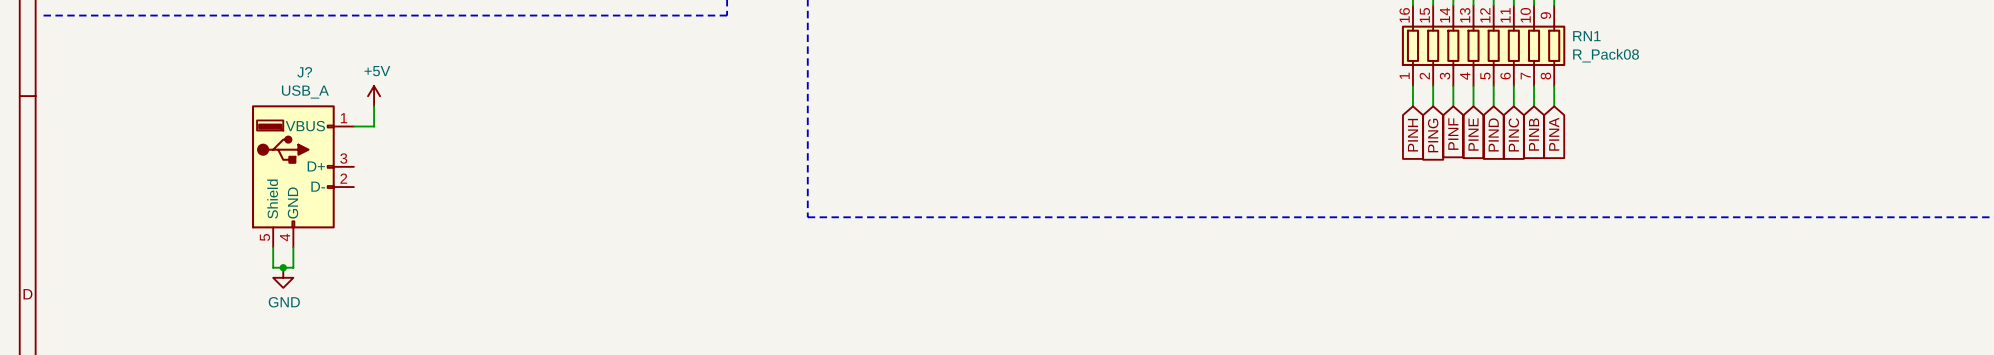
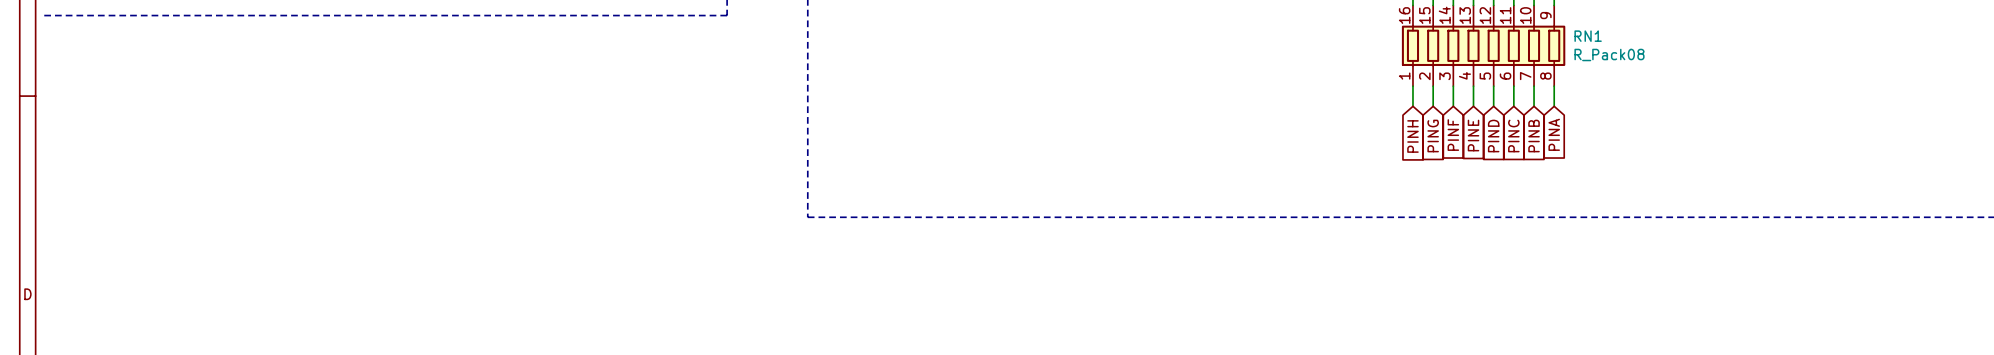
power symbol: +5V (374, 96) -> none
wire: (374, 106) (374, 126) (353, 126) -> none
J?: USB_A (302, 176) -> none
wire: (273, 247) (273, 267) (293, 267) (293, 247) -> none
junction: (283, 267) -> none
power symbol: GND (283, 277) -> none

